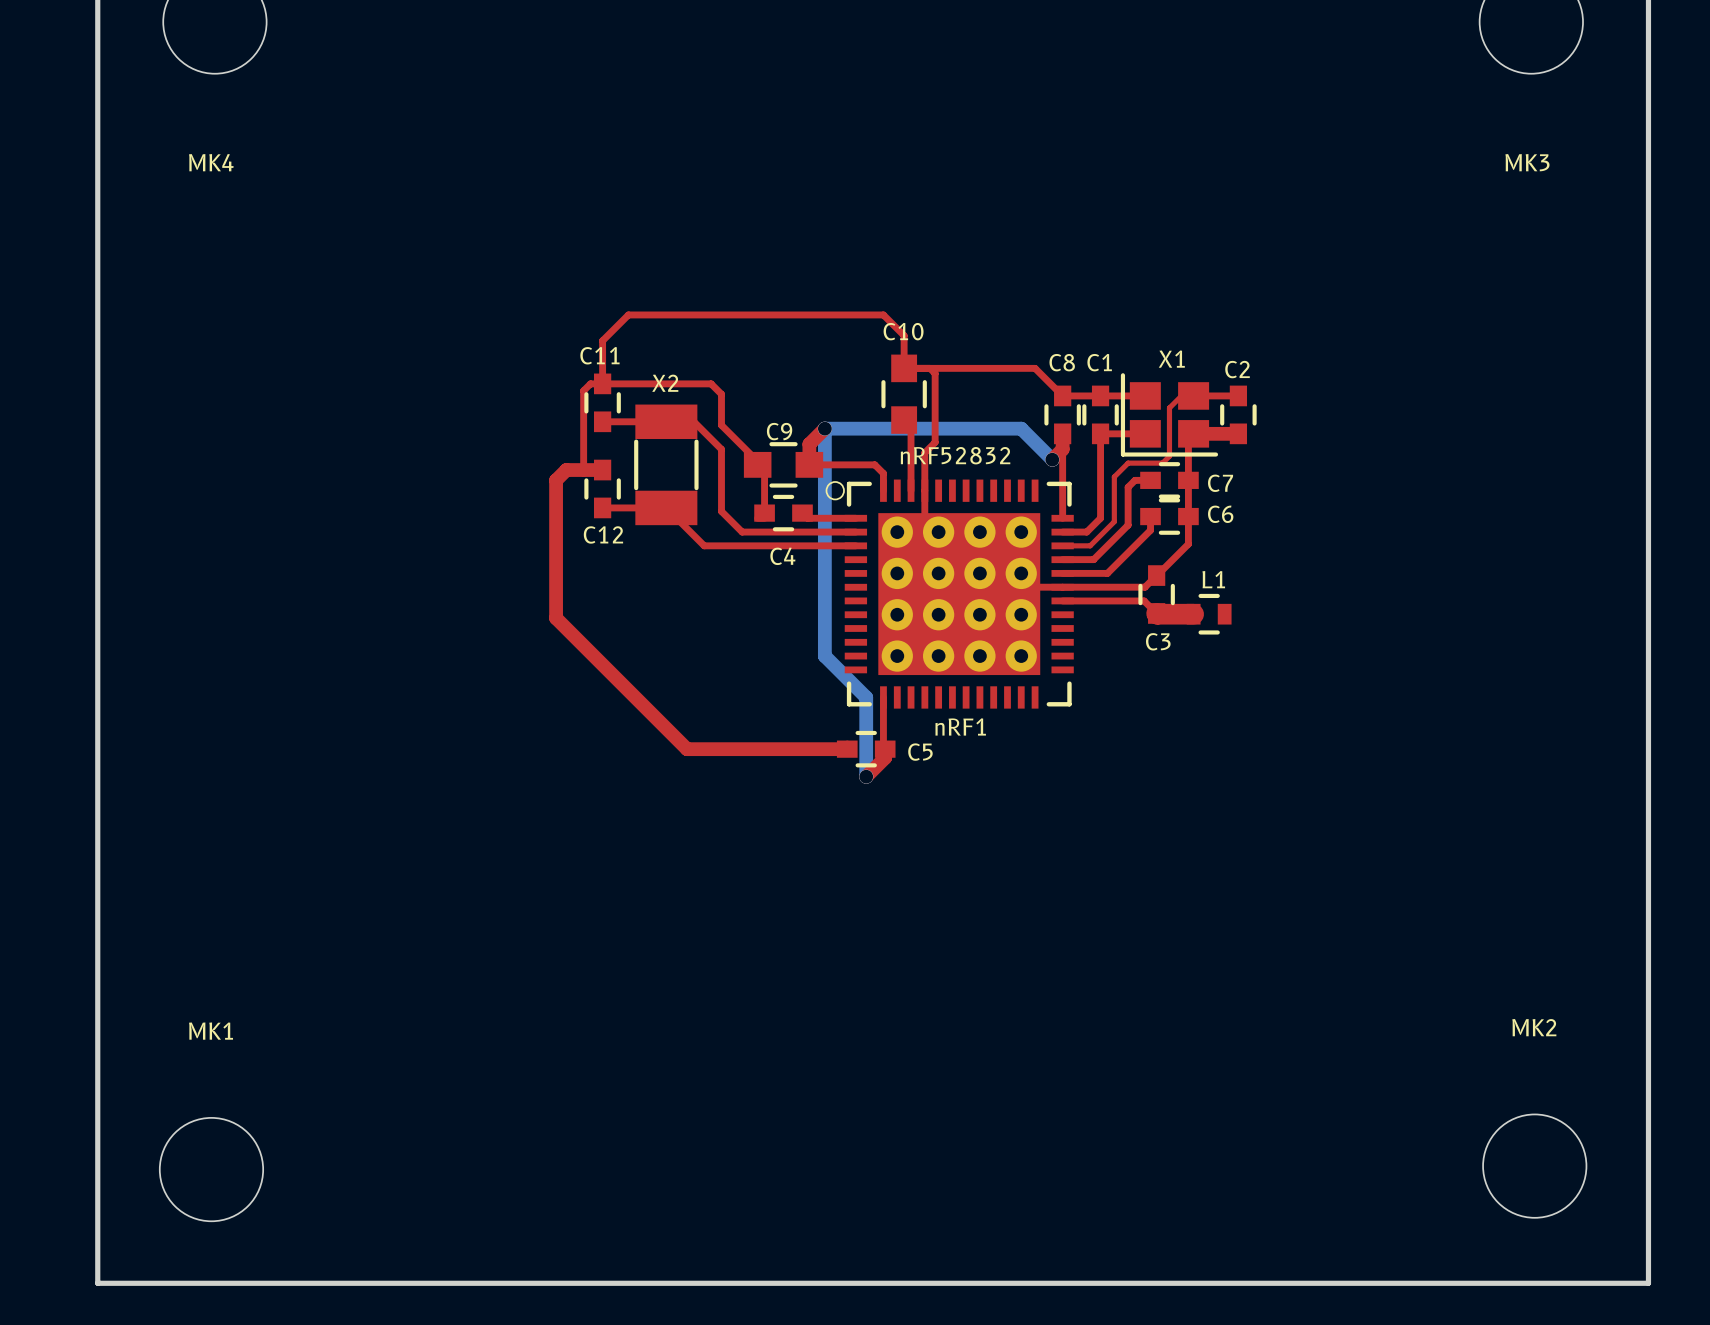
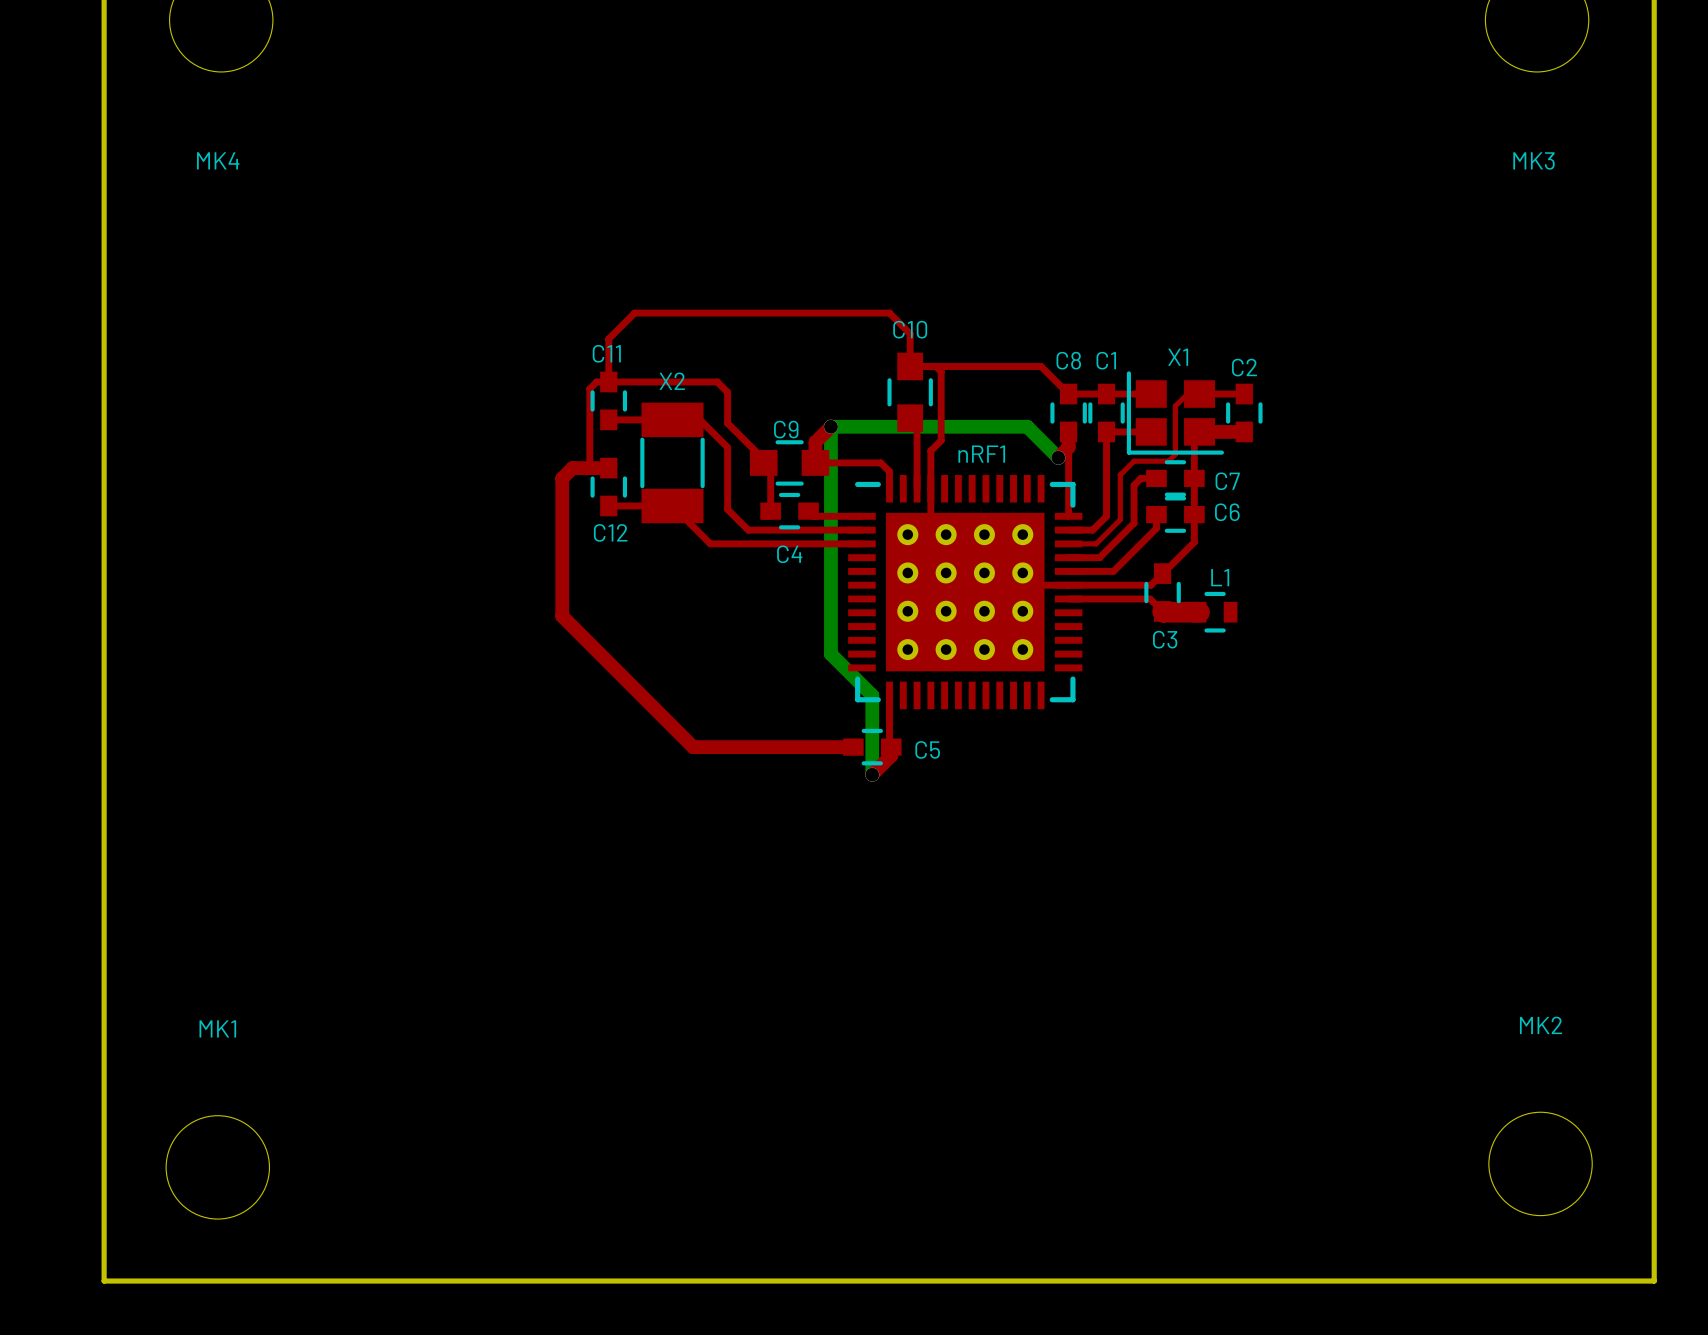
nRF1 value: nRF52832 (955, 455) -> none
nRF1 footprint: [826, 479, 1074, 709] -> [848, 474, 1083, 710]
nRF1 name position: nRF1 (960, 726) -> nRF1 (981, 454)

